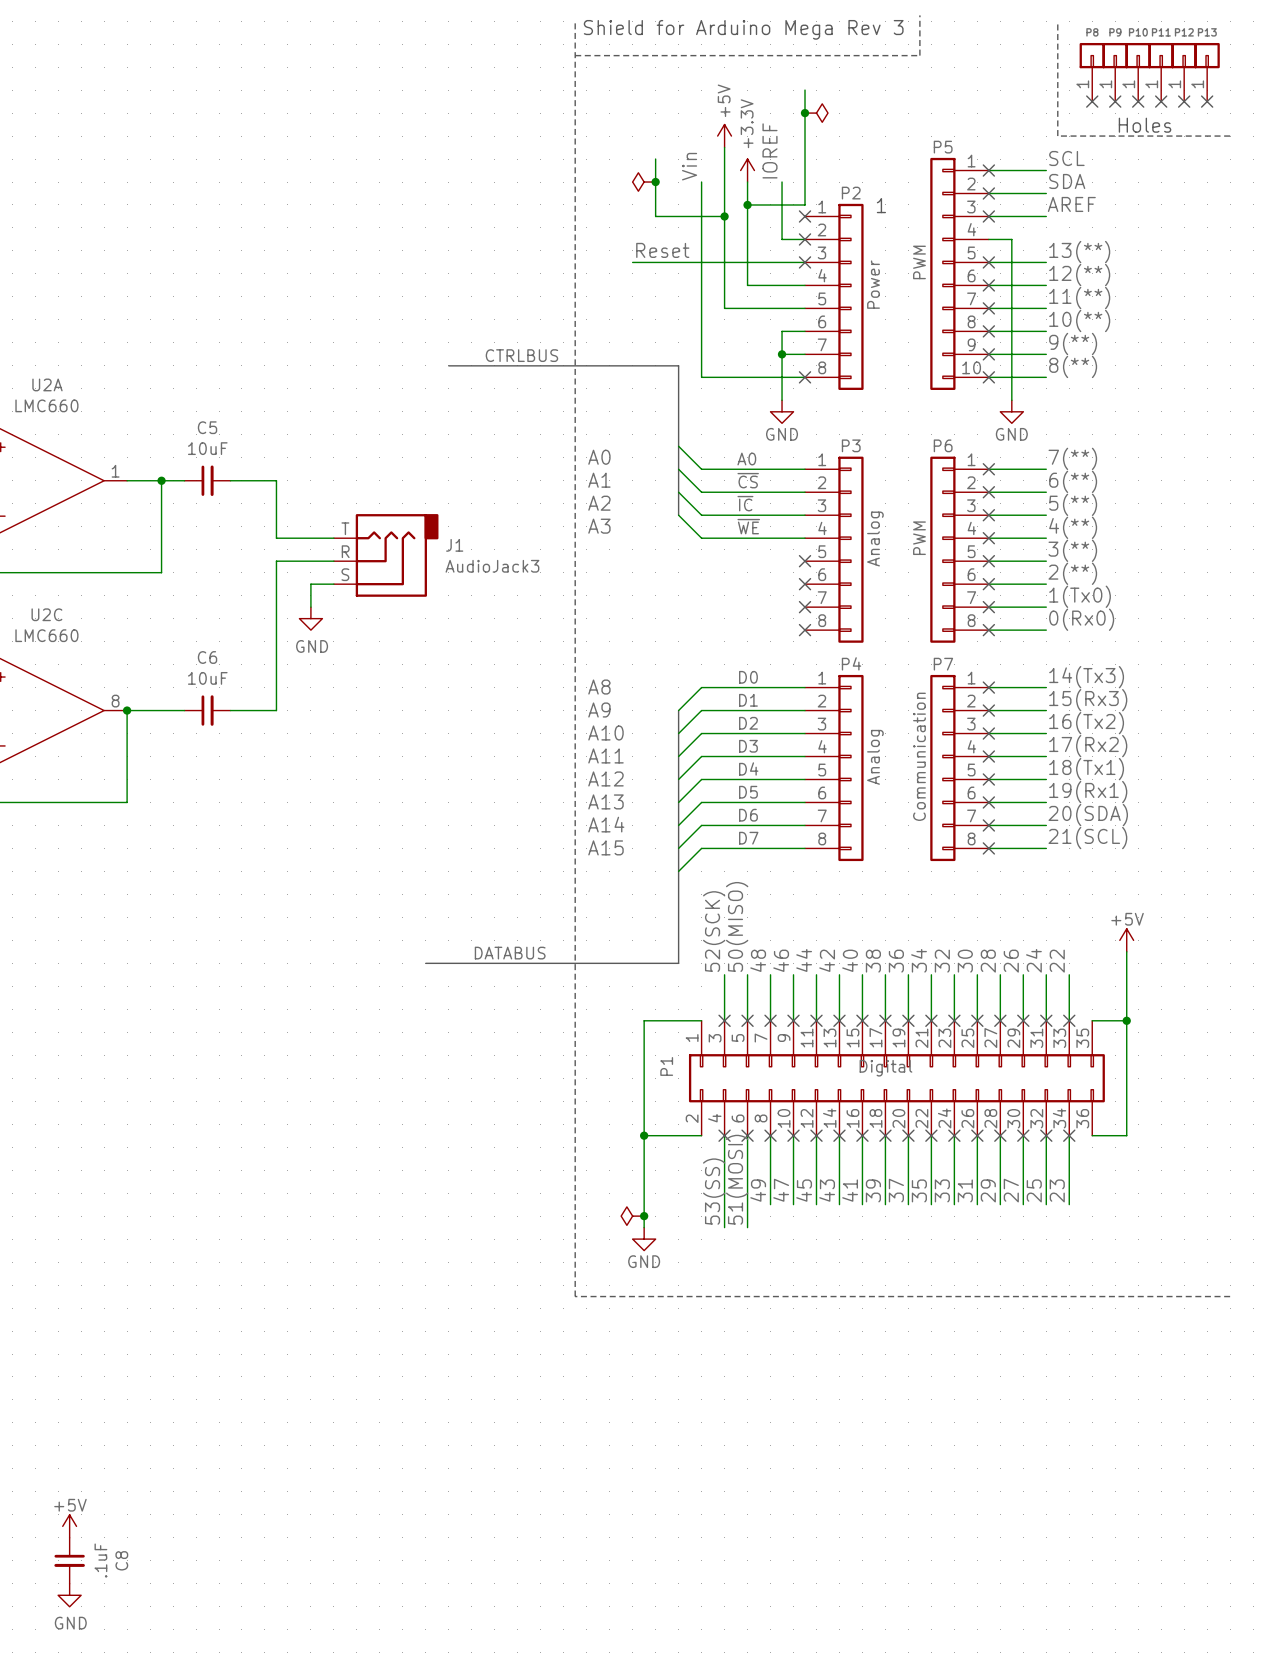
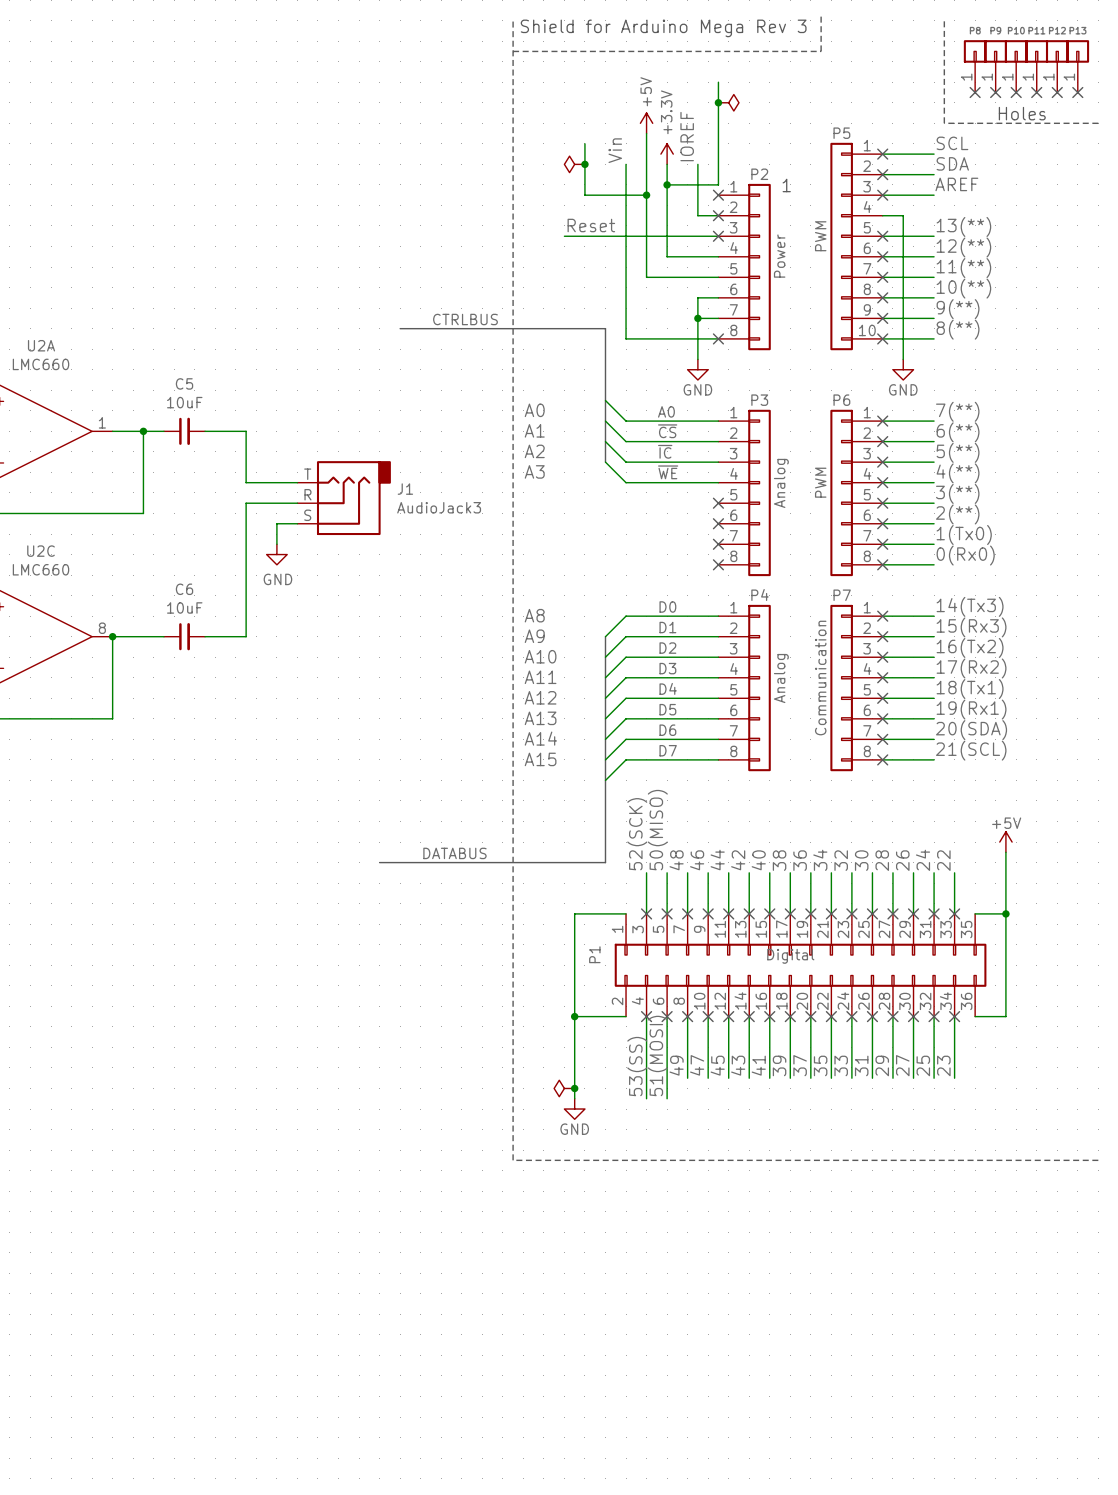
power symbol: +5V (69, 1526) -> none
C8: .1uF (69, 1560) -> none
power symbol: GND (69, 1595) -> none

